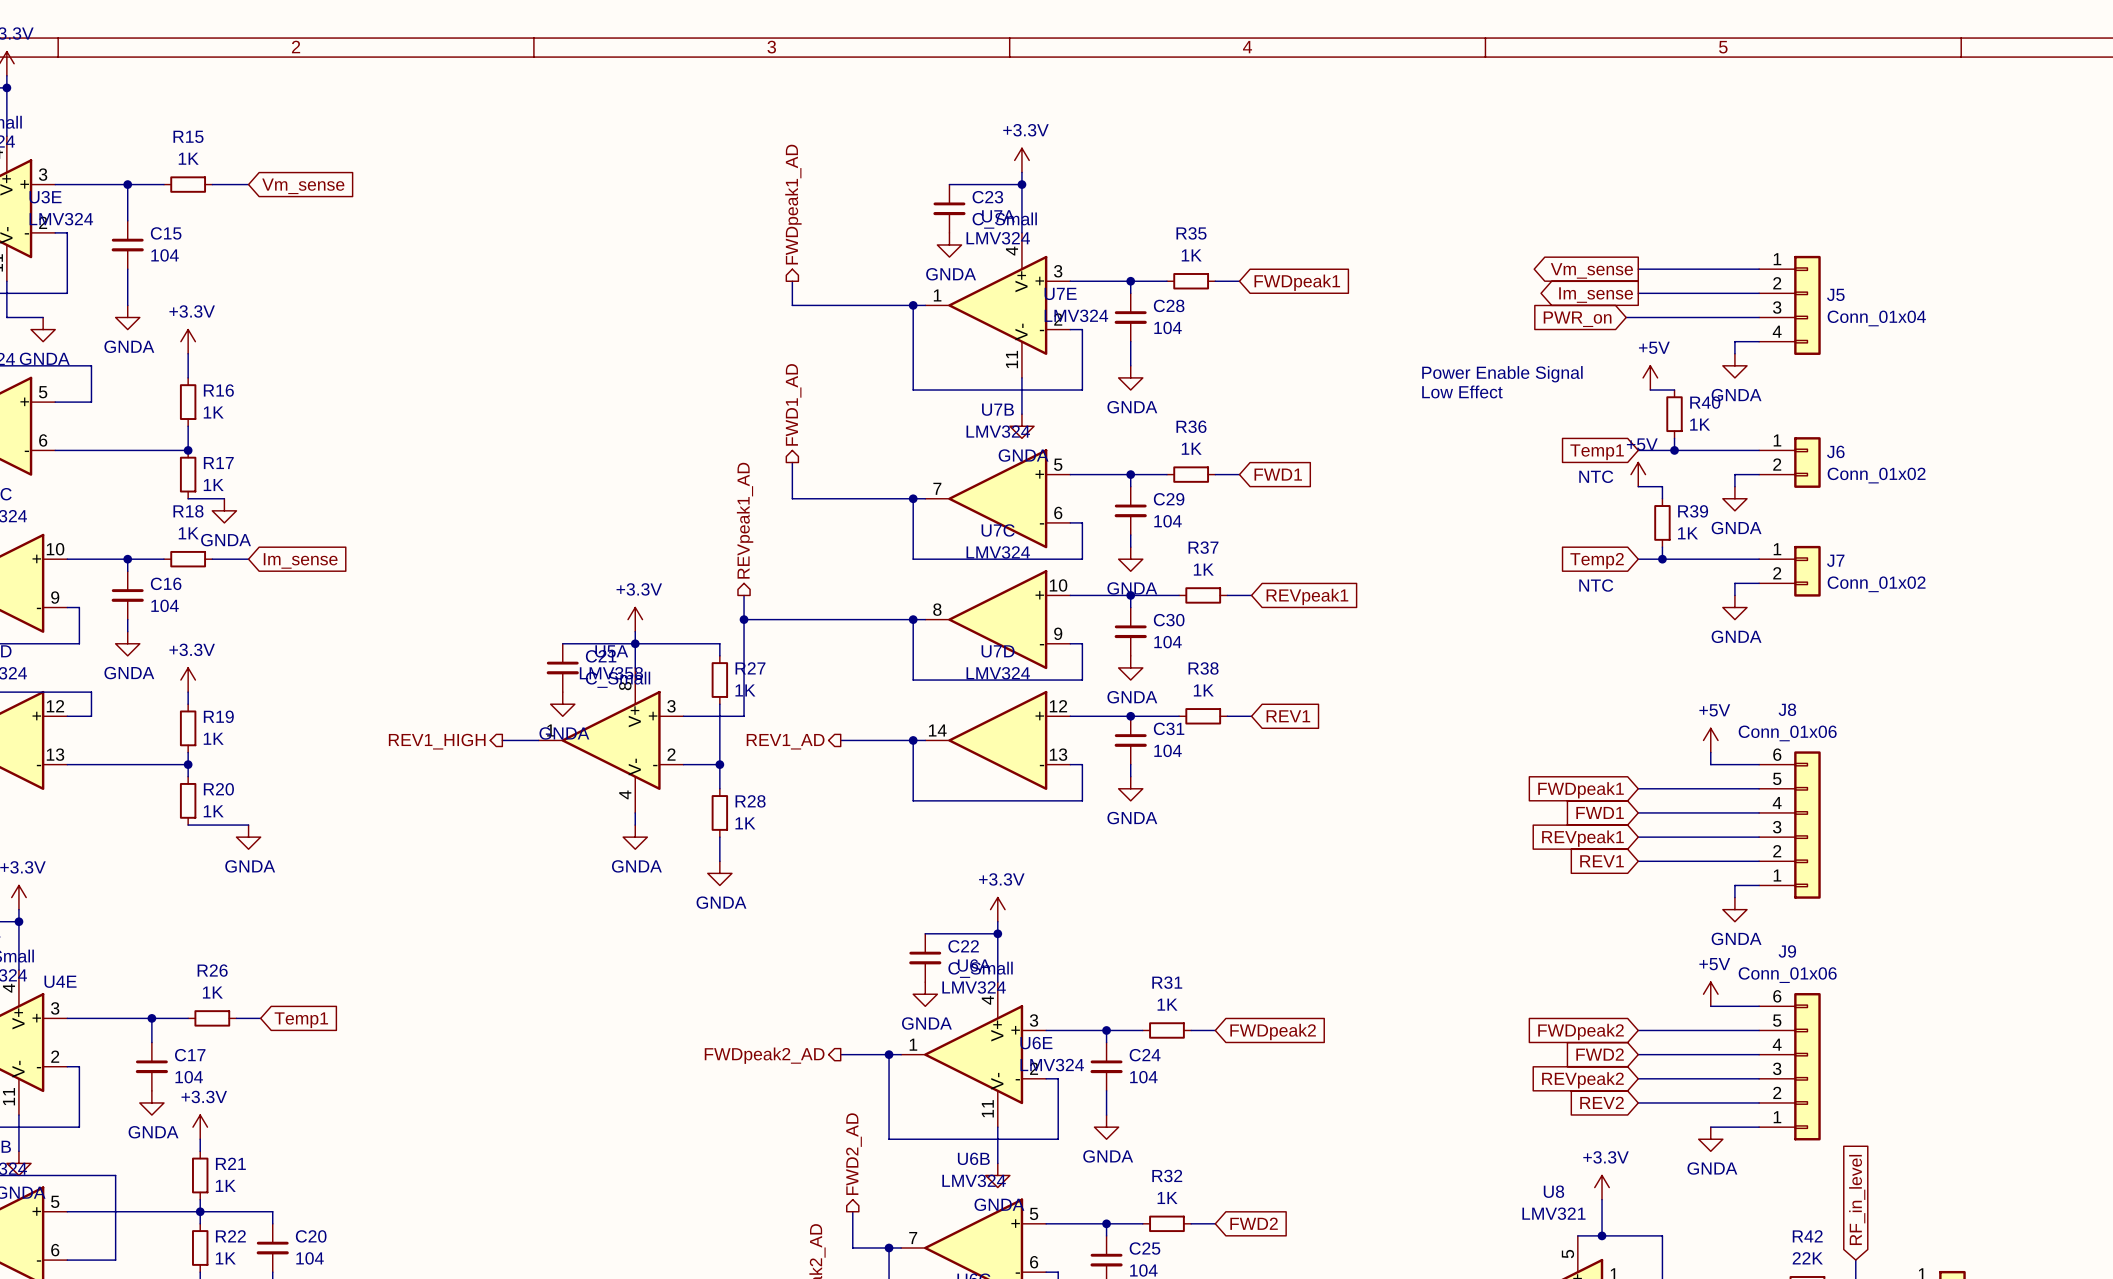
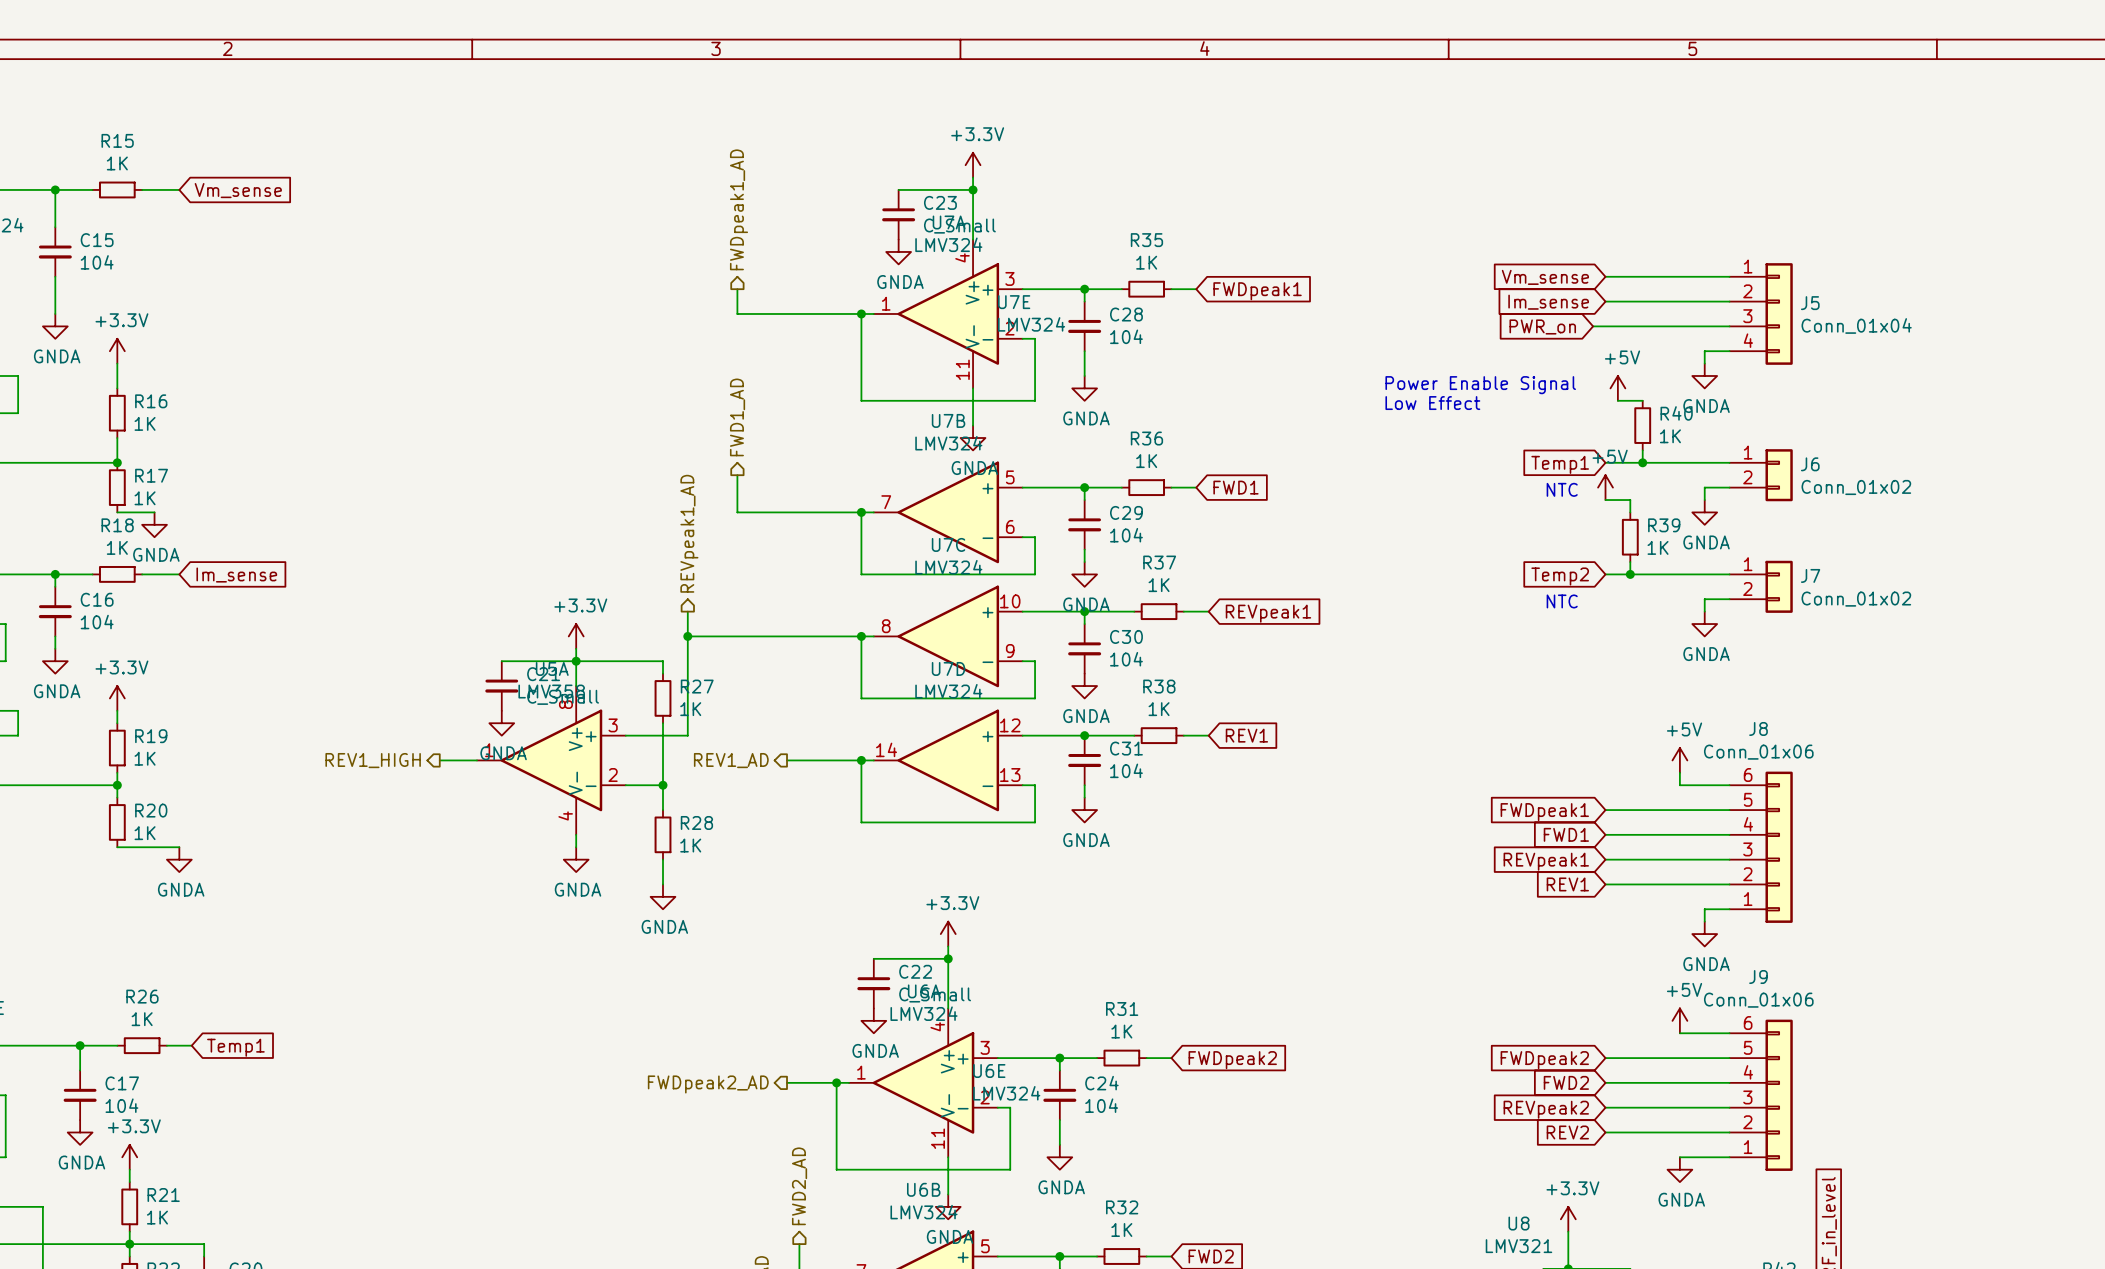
global label shape: output (1591, 270) -> input (1545, 277)
global label shape: output (1596, 295) -> input (1548, 302)

